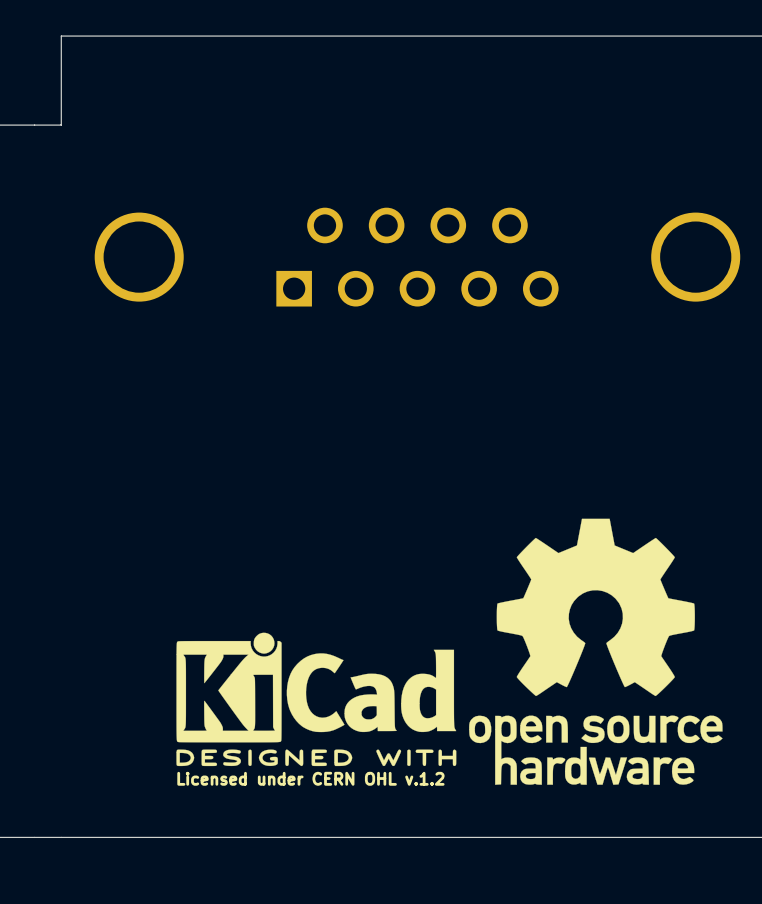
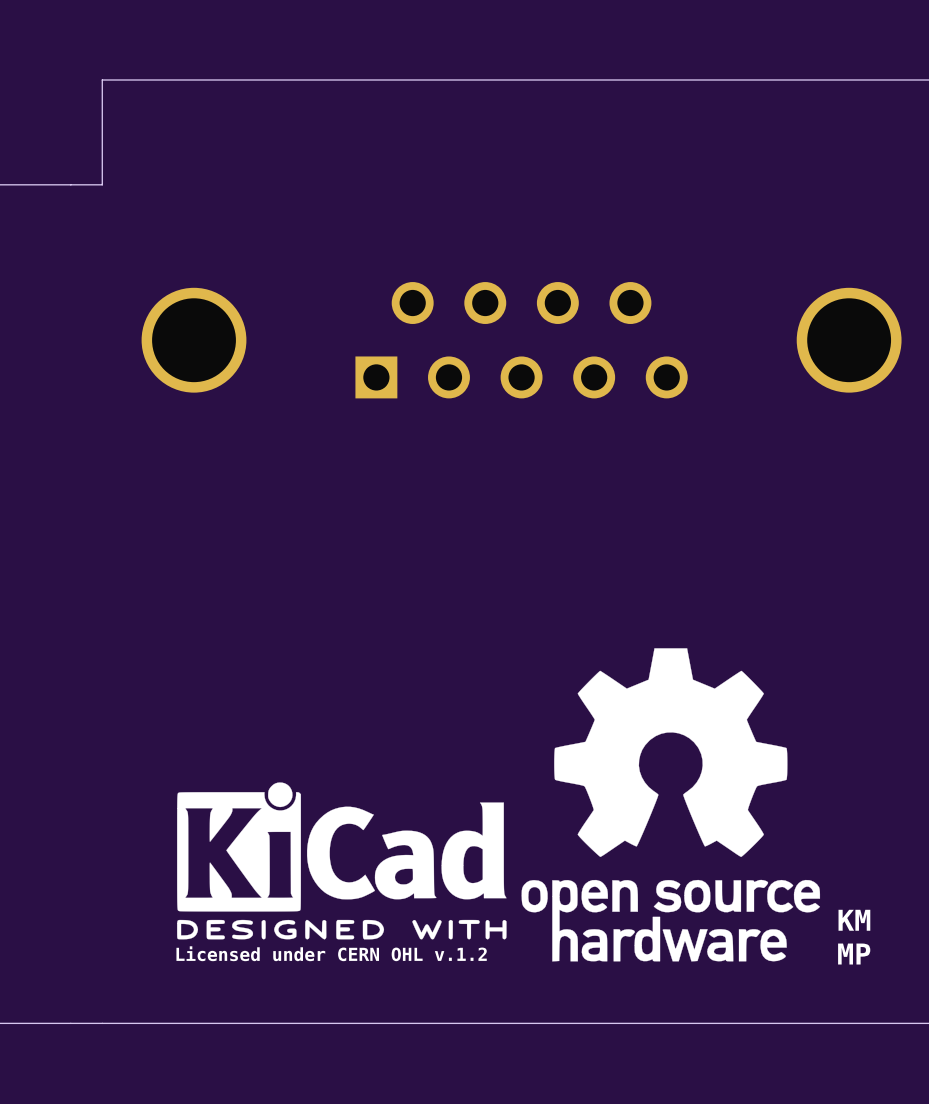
drawing position: (595, 651) -> (670, 804)
drawing position: (316, 699) -> (341, 860)
text: none -> KM (854, 920)
text position: Licensed under CERN OHL v.1.2 (310, 778) -> Licensed under CERN OHL v.1.2 (331, 953)
text: none -> MP (854, 954)

